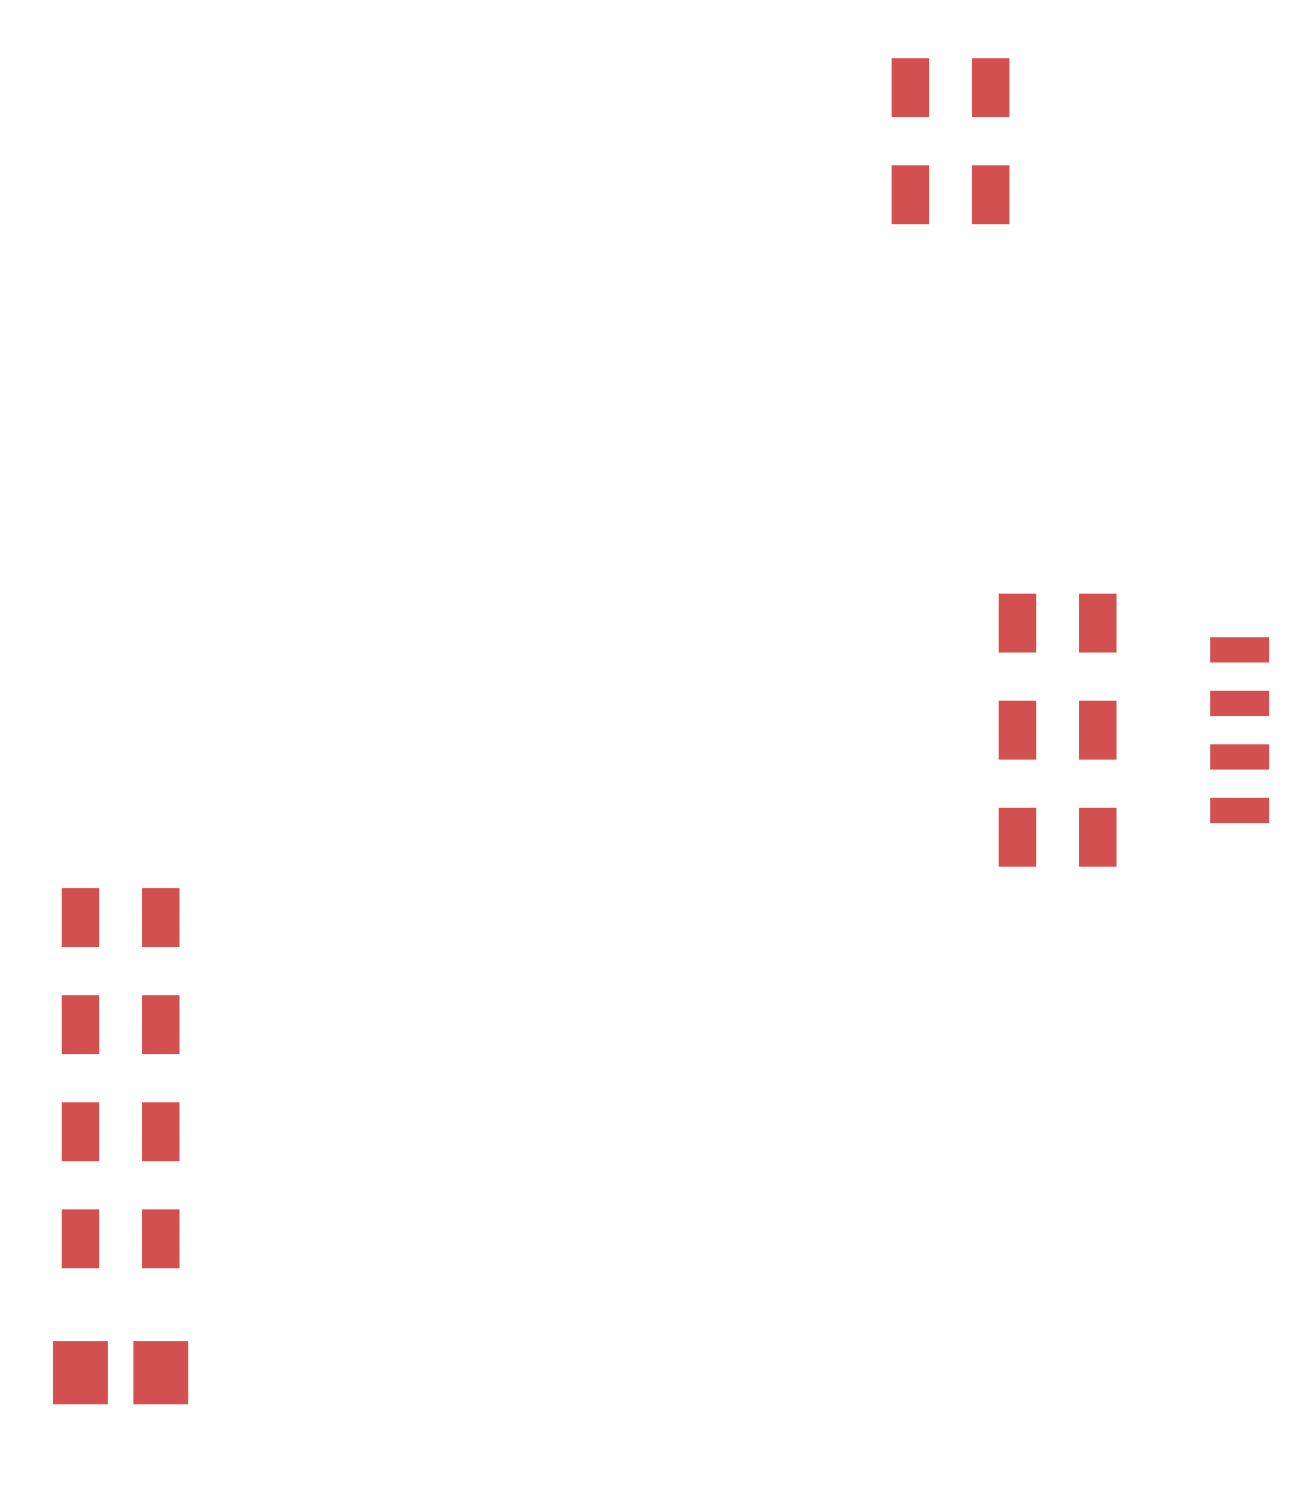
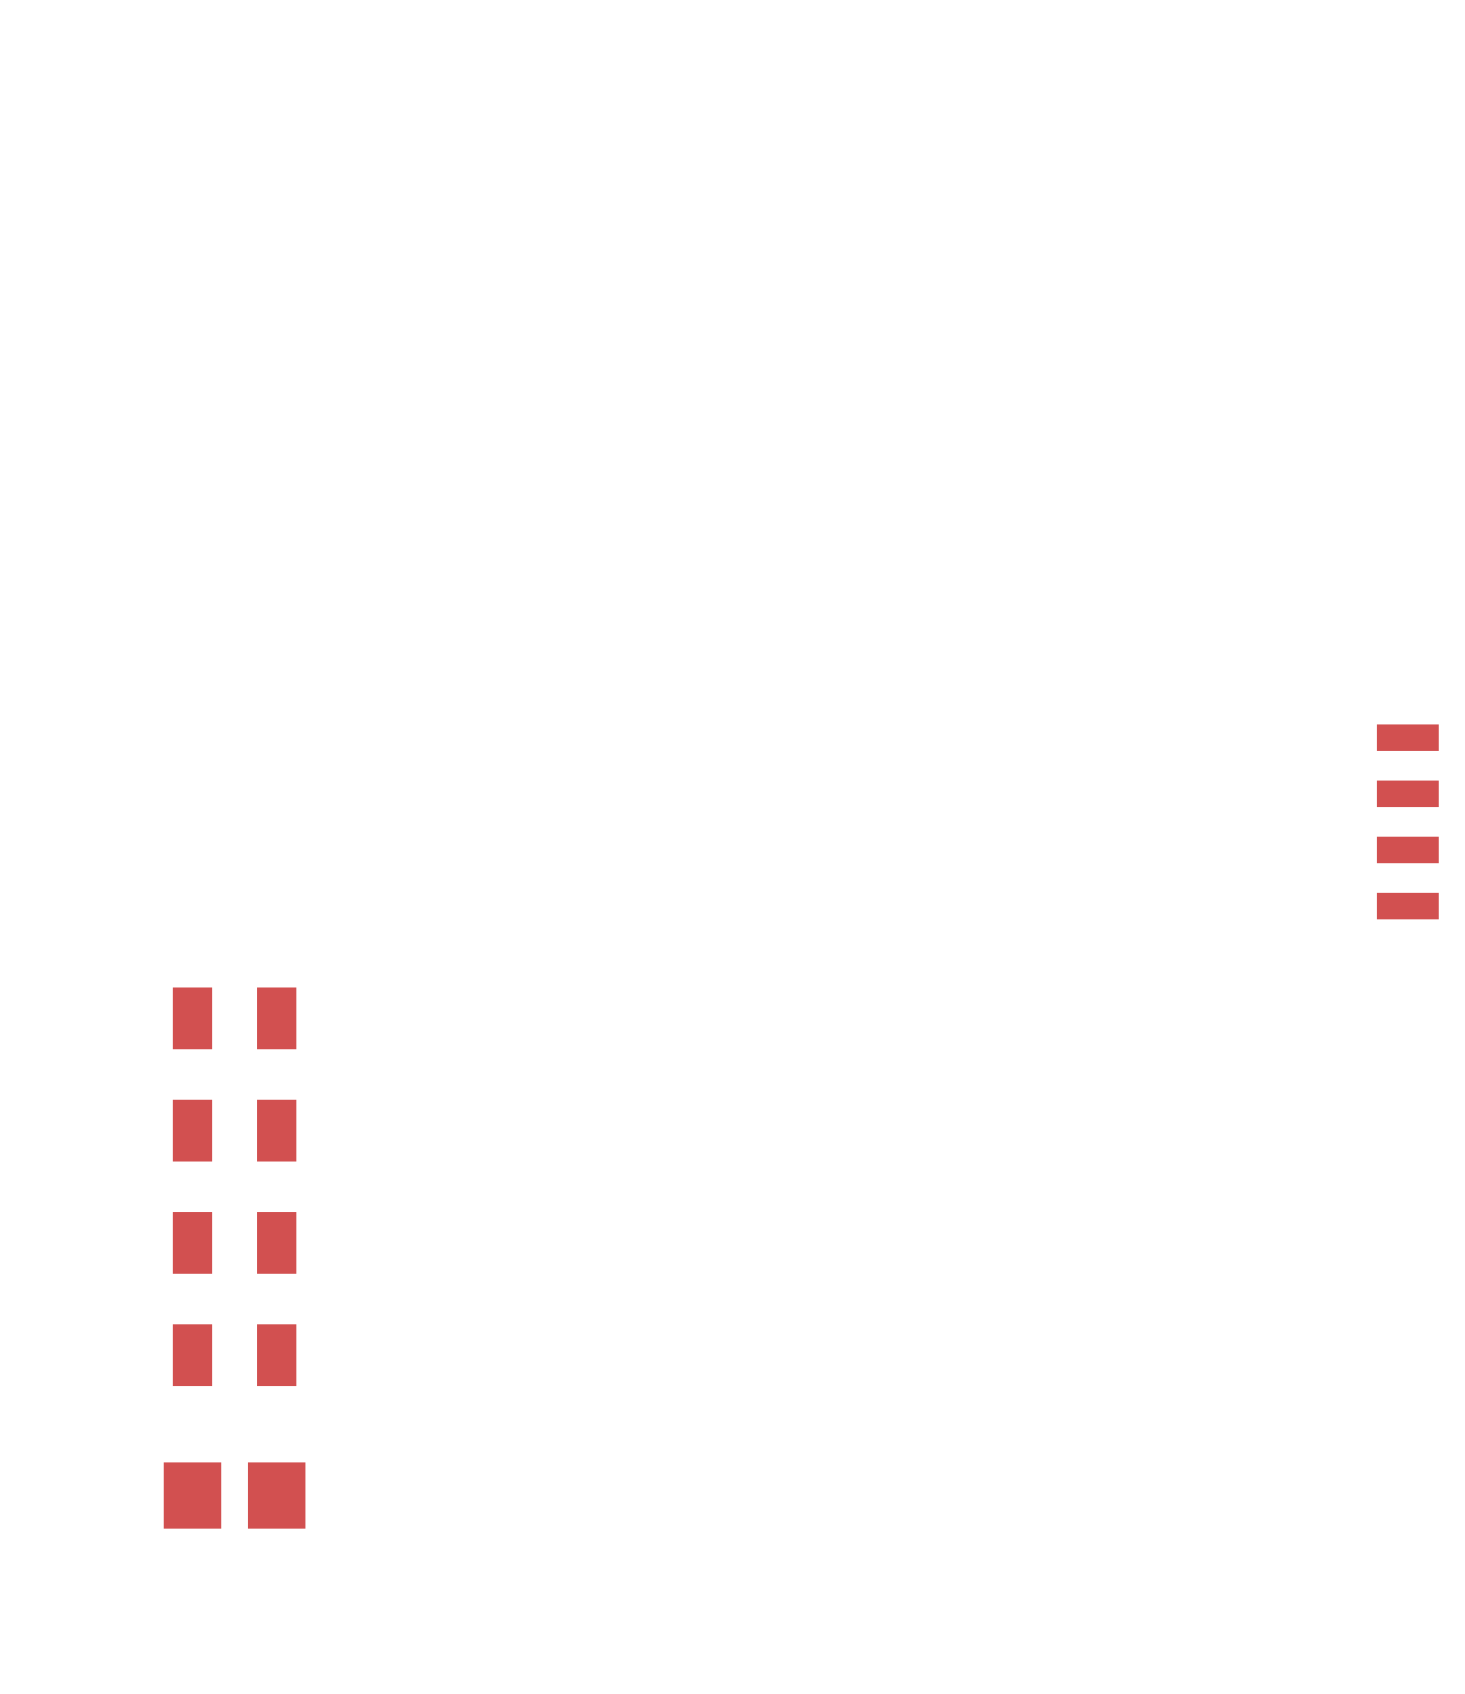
part: (950, 87) -> none
part: (950, 194) -> none
part: (1057, 623) -> none
part: (1057, 730) -> none
part: (1057, 837) -> none

